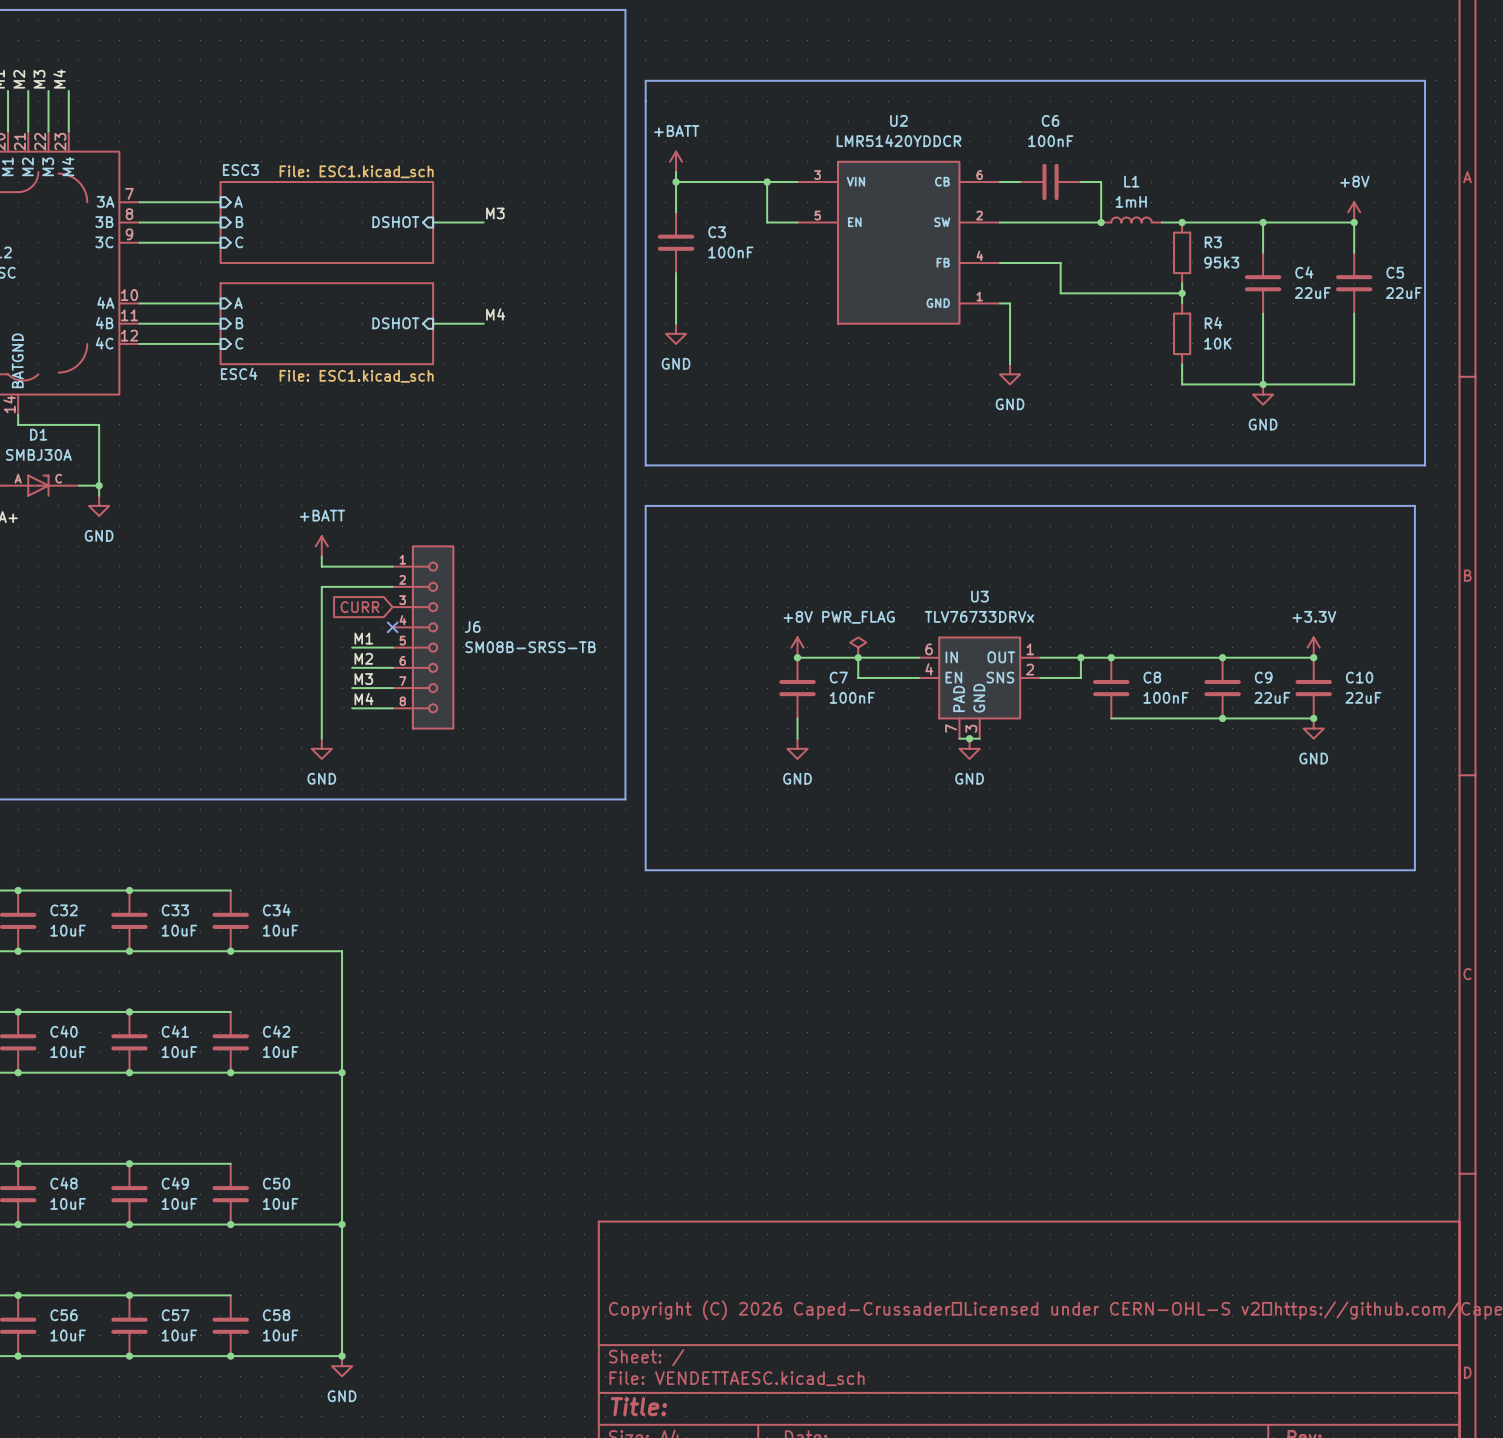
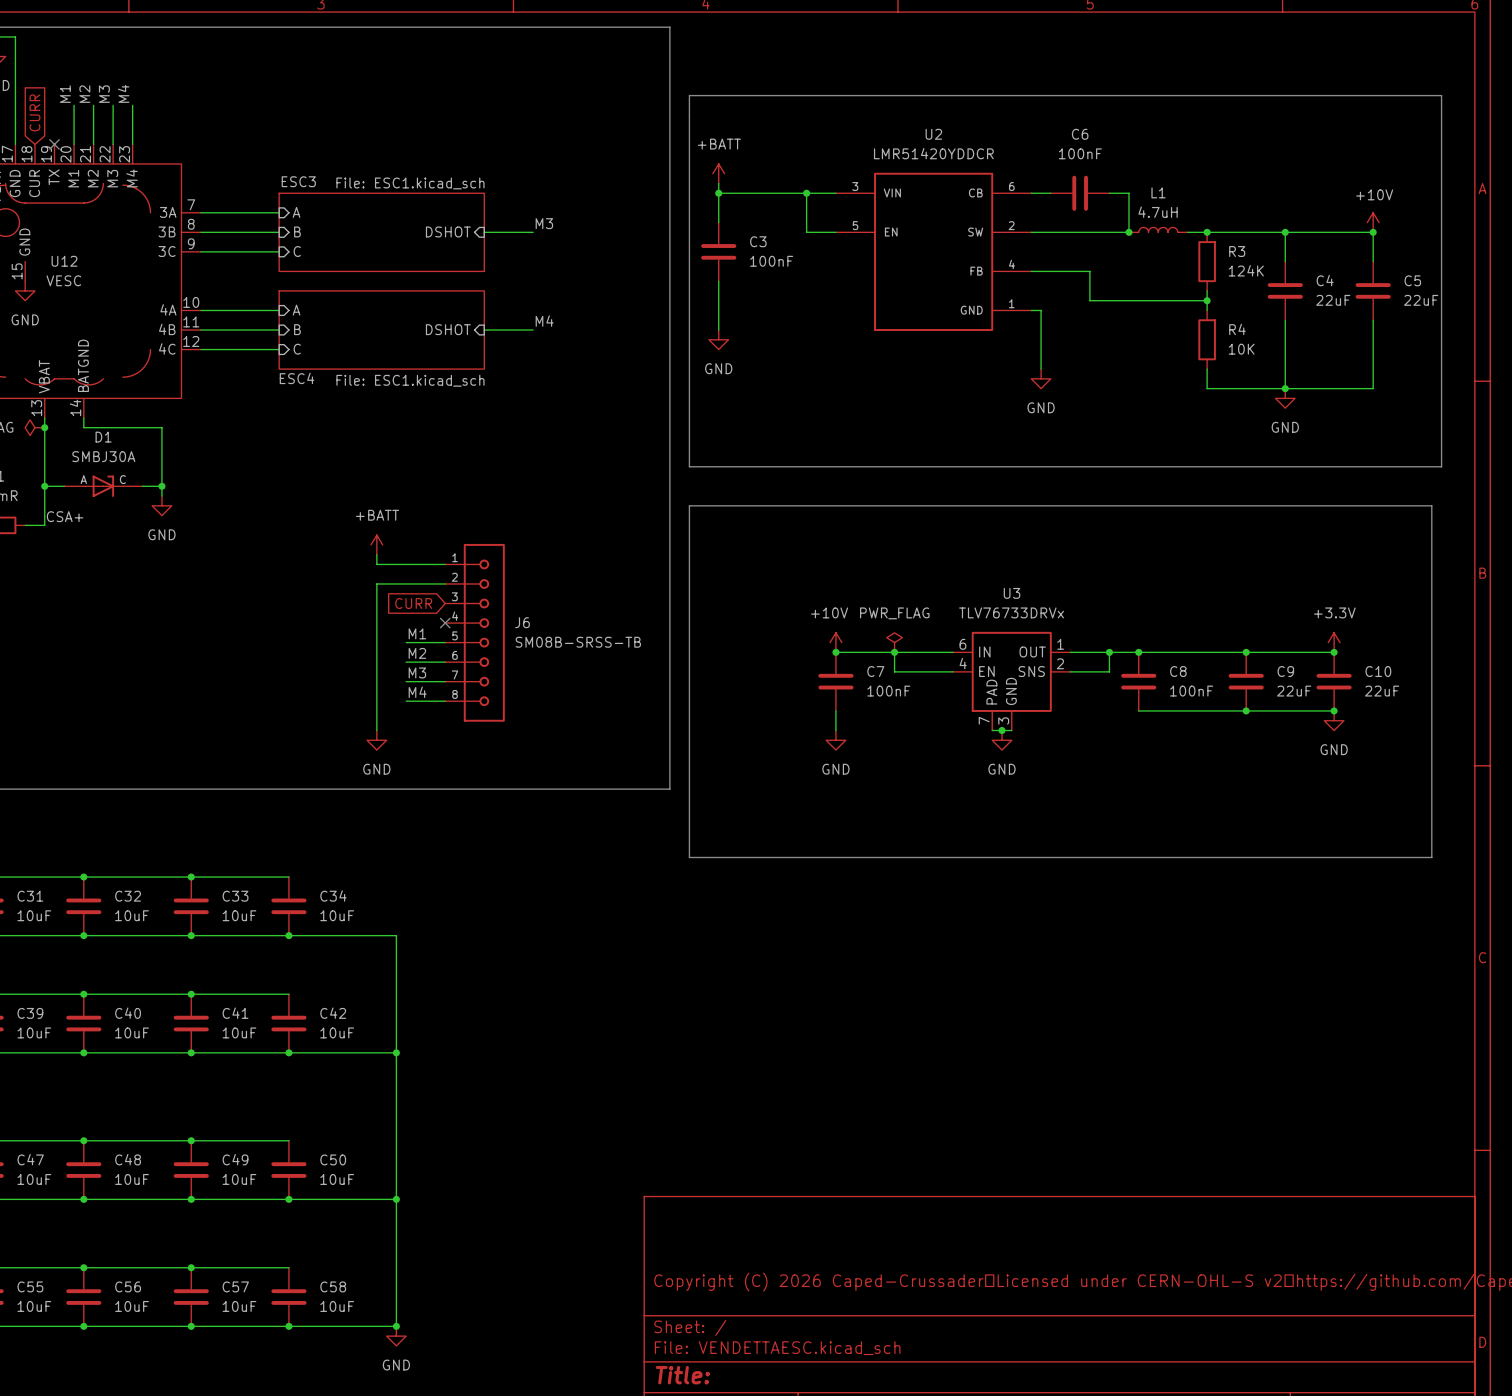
L1 value: 1mH (1131, 201) -> 4.7uH (1158, 212)
power symbol: +8V (1354, 212) -> +10V (1373, 222)
R3 value: 95k3 (1221, 262) -> 124K (1246, 270)
power symbol: +8V (797, 647) -> +10V (835, 642)

